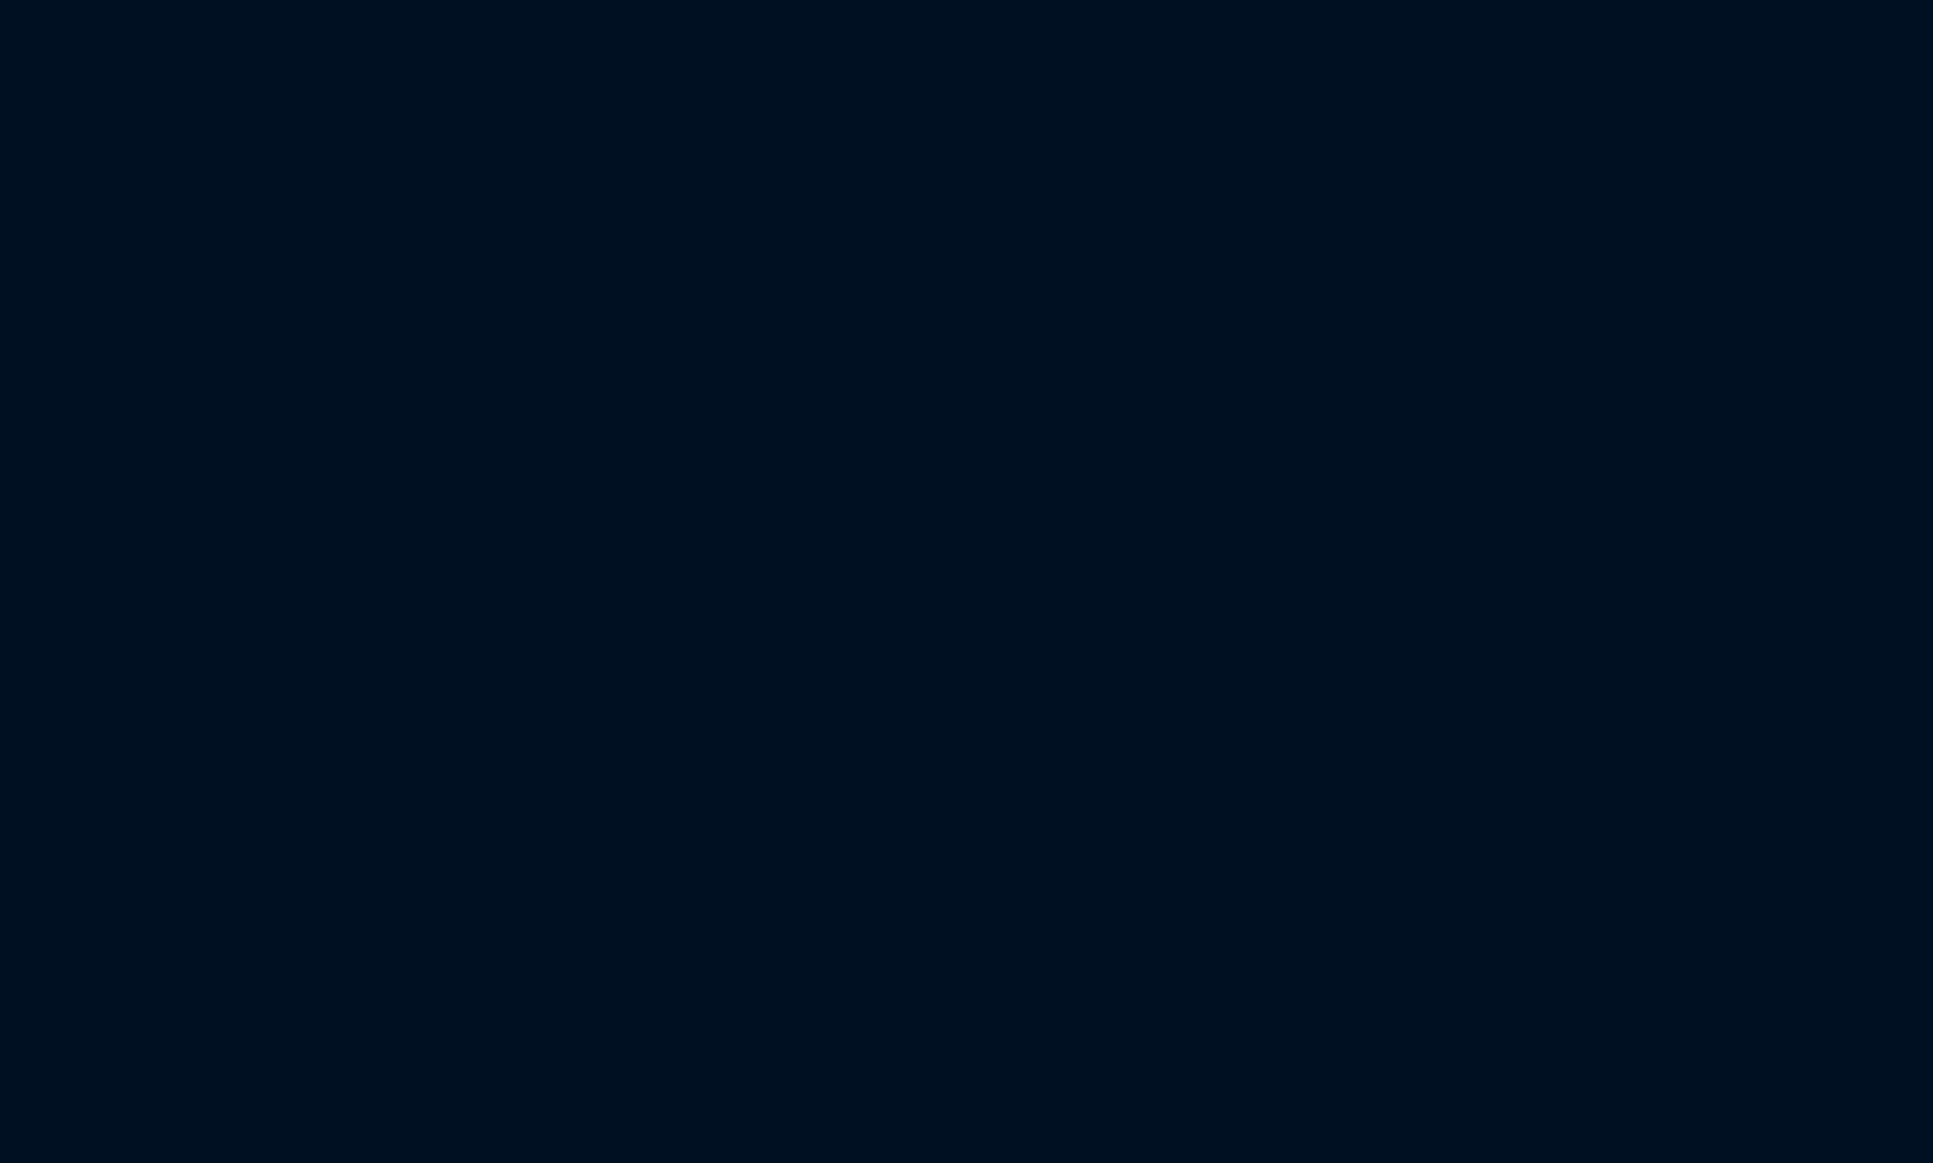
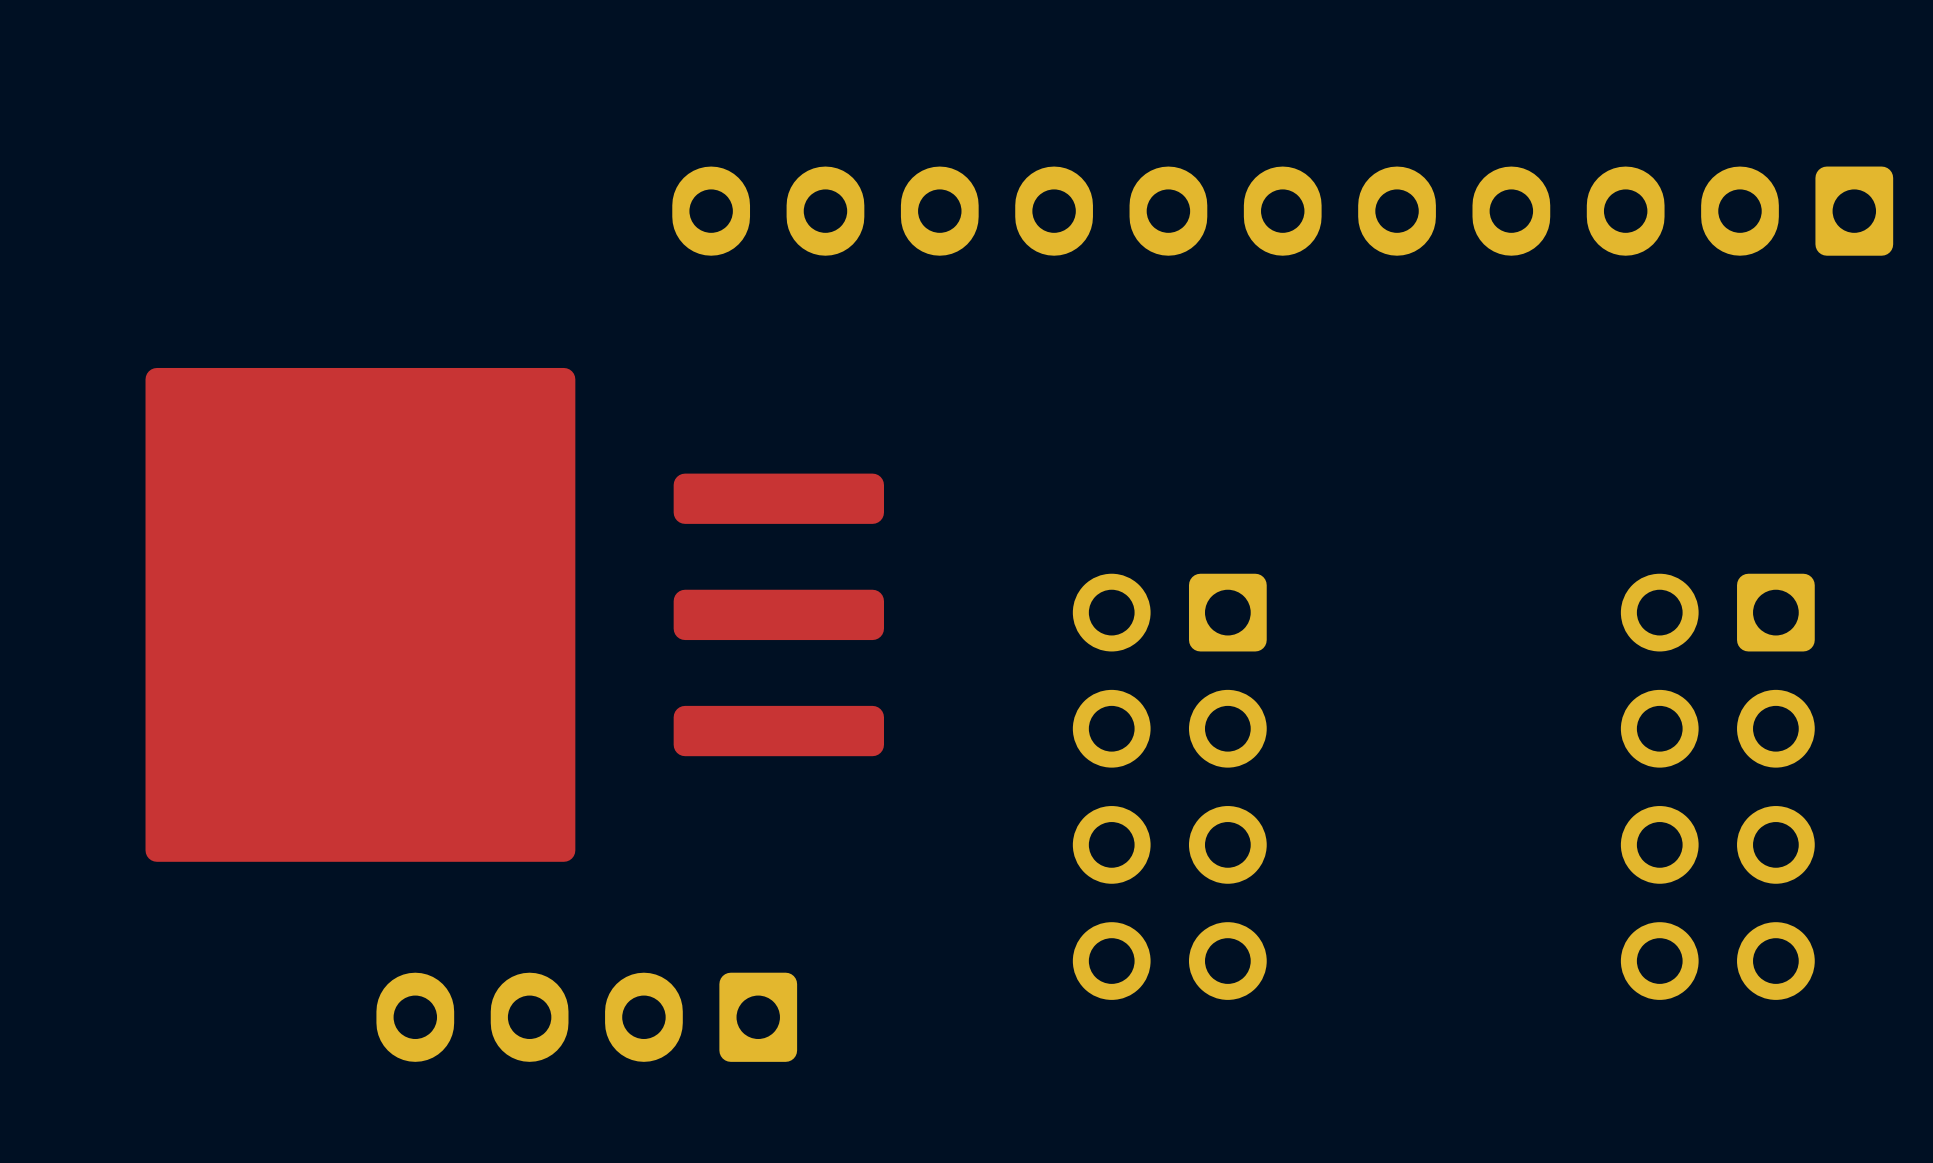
part: none -> (1282, 211)
part: none -> (514, 614)
part: none -> (1169, 786)
part: none -> (1717, 786)
part: none -> (586, 1017)

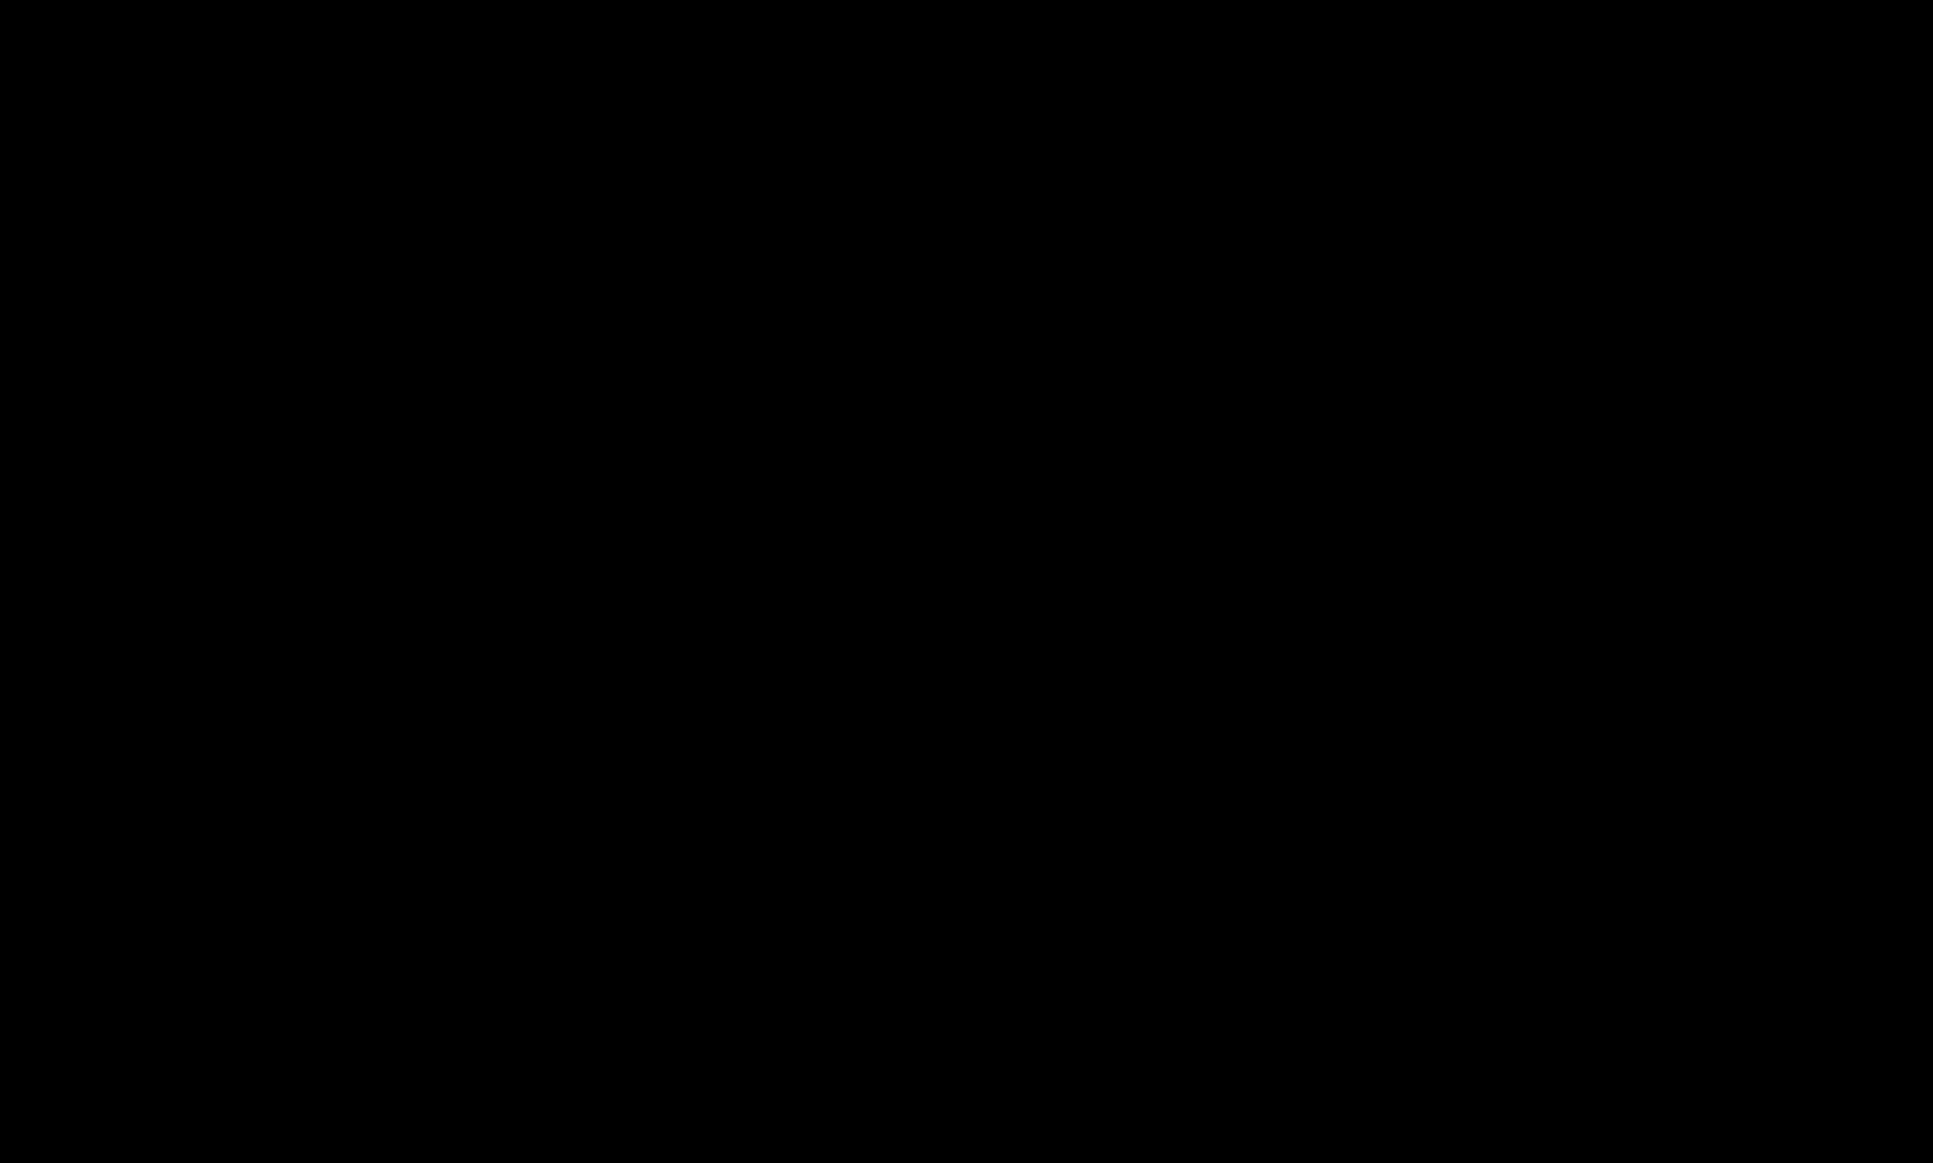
part: (1282, 211) -> none
part: (514, 614) -> none
part: (1169, 786) -> none
part: (1717, 786) -> none
part: (586, 1017) -> none

